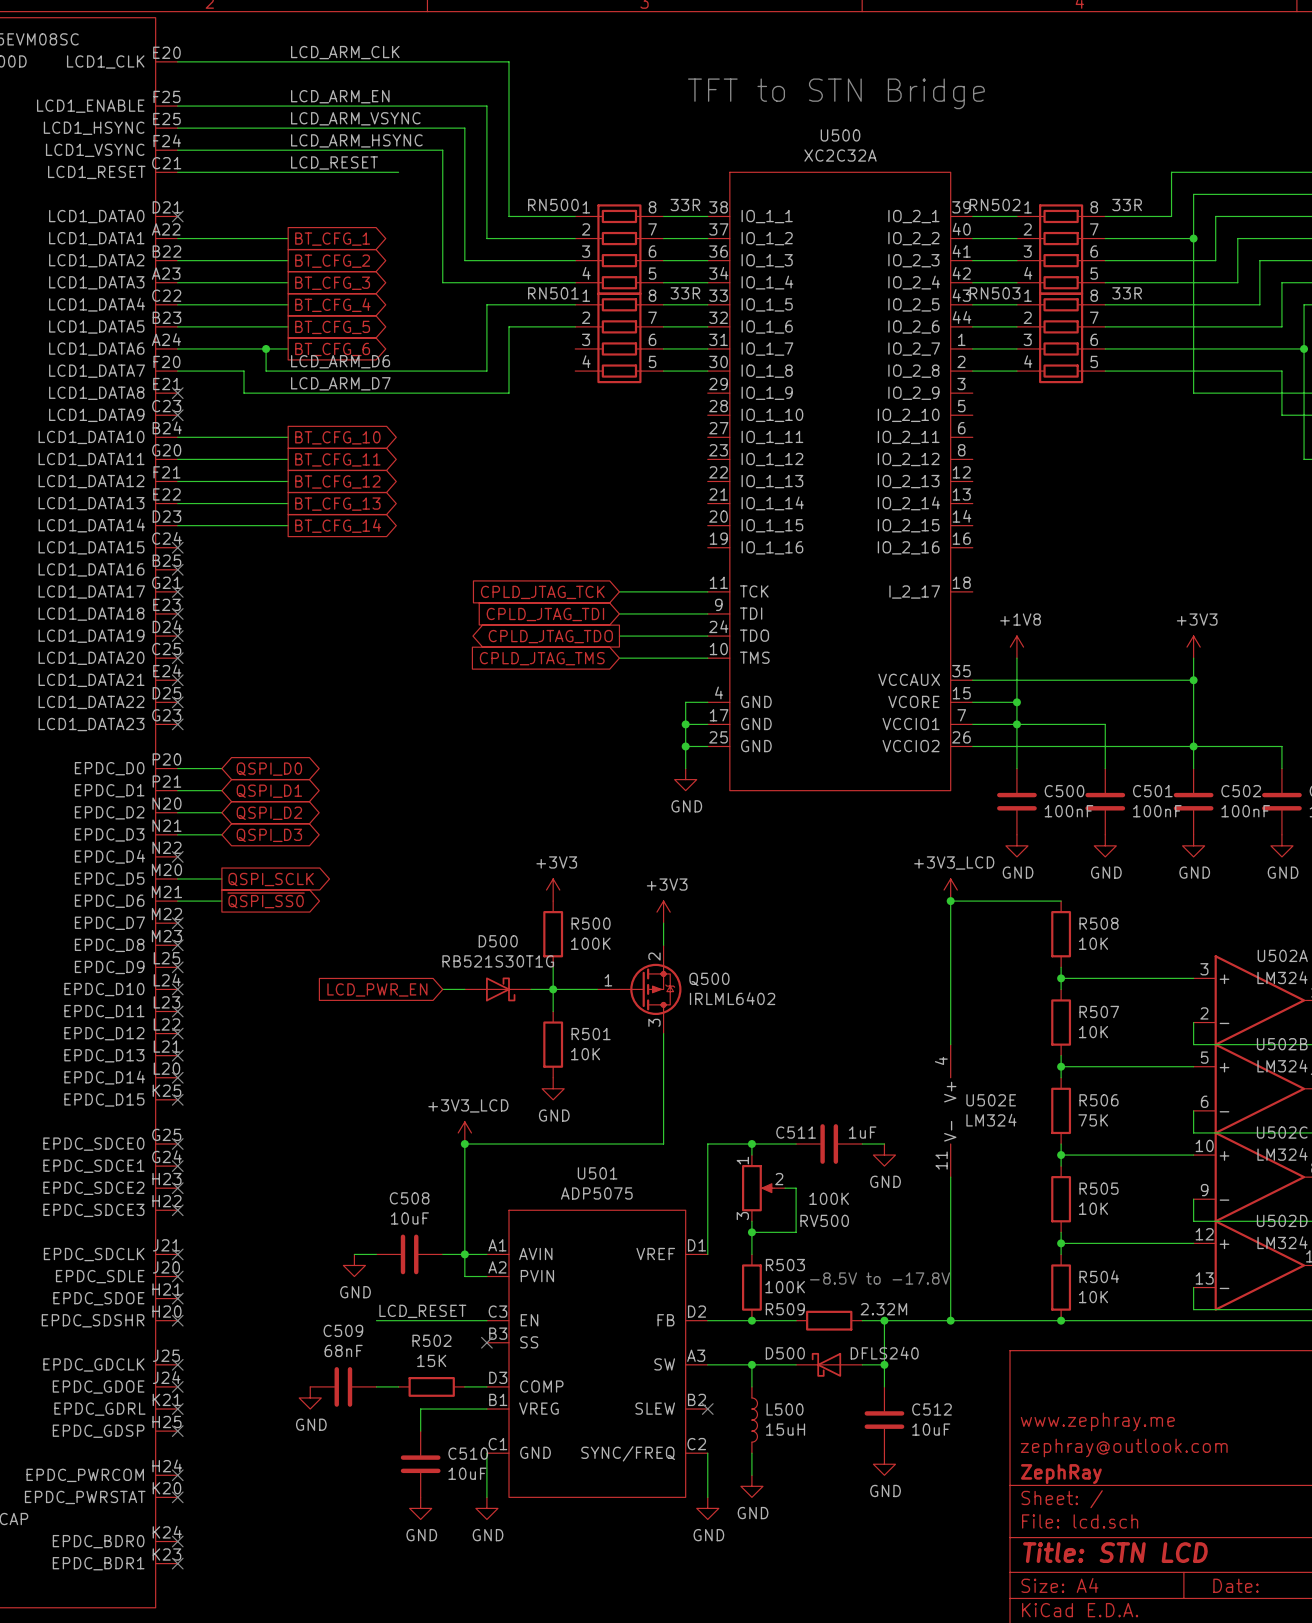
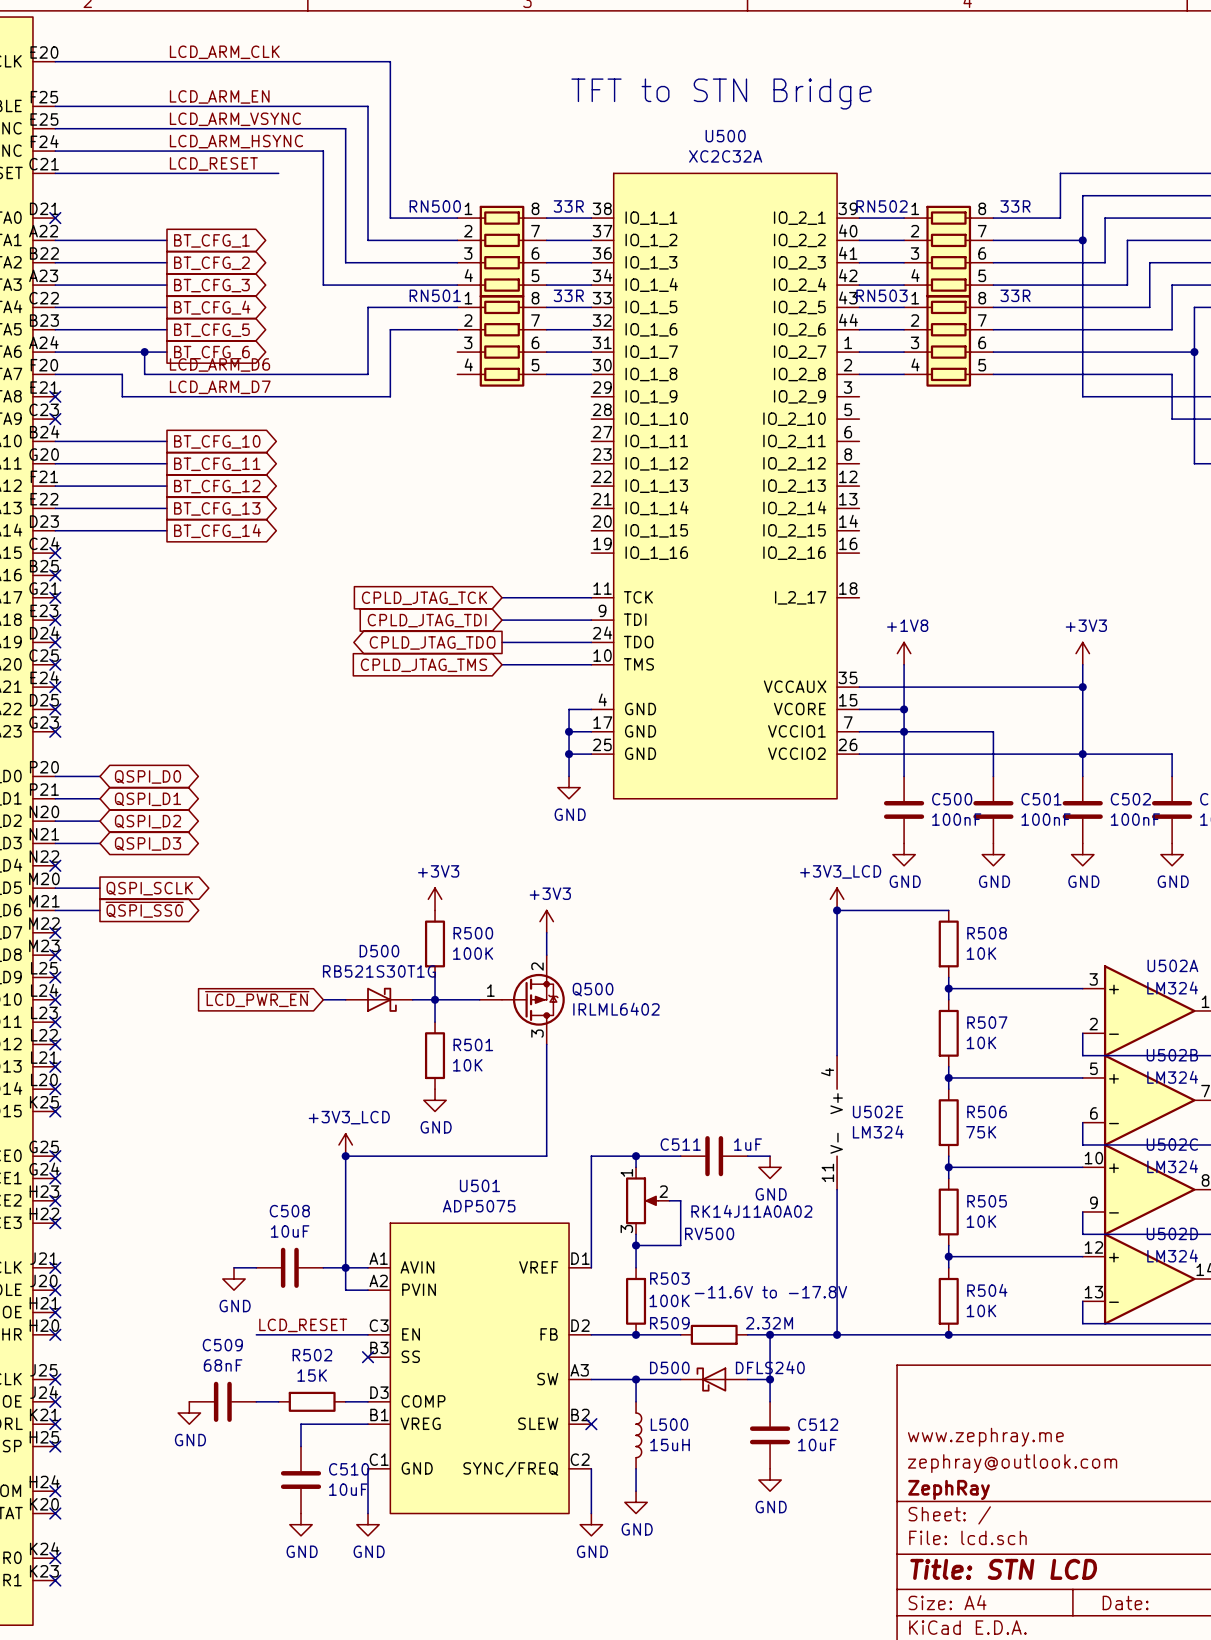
global label: LCD_PWR_EN (377, 989) -> ~{LCD_PWR_EN} (257, 999)
RV500 value: 100K (829, 1198) -> RK14J11A0A02 (751, 1211)
text: -8.5V to -17.8V (880, 1278) -> -11.6V to -17.8V (770, 1292)

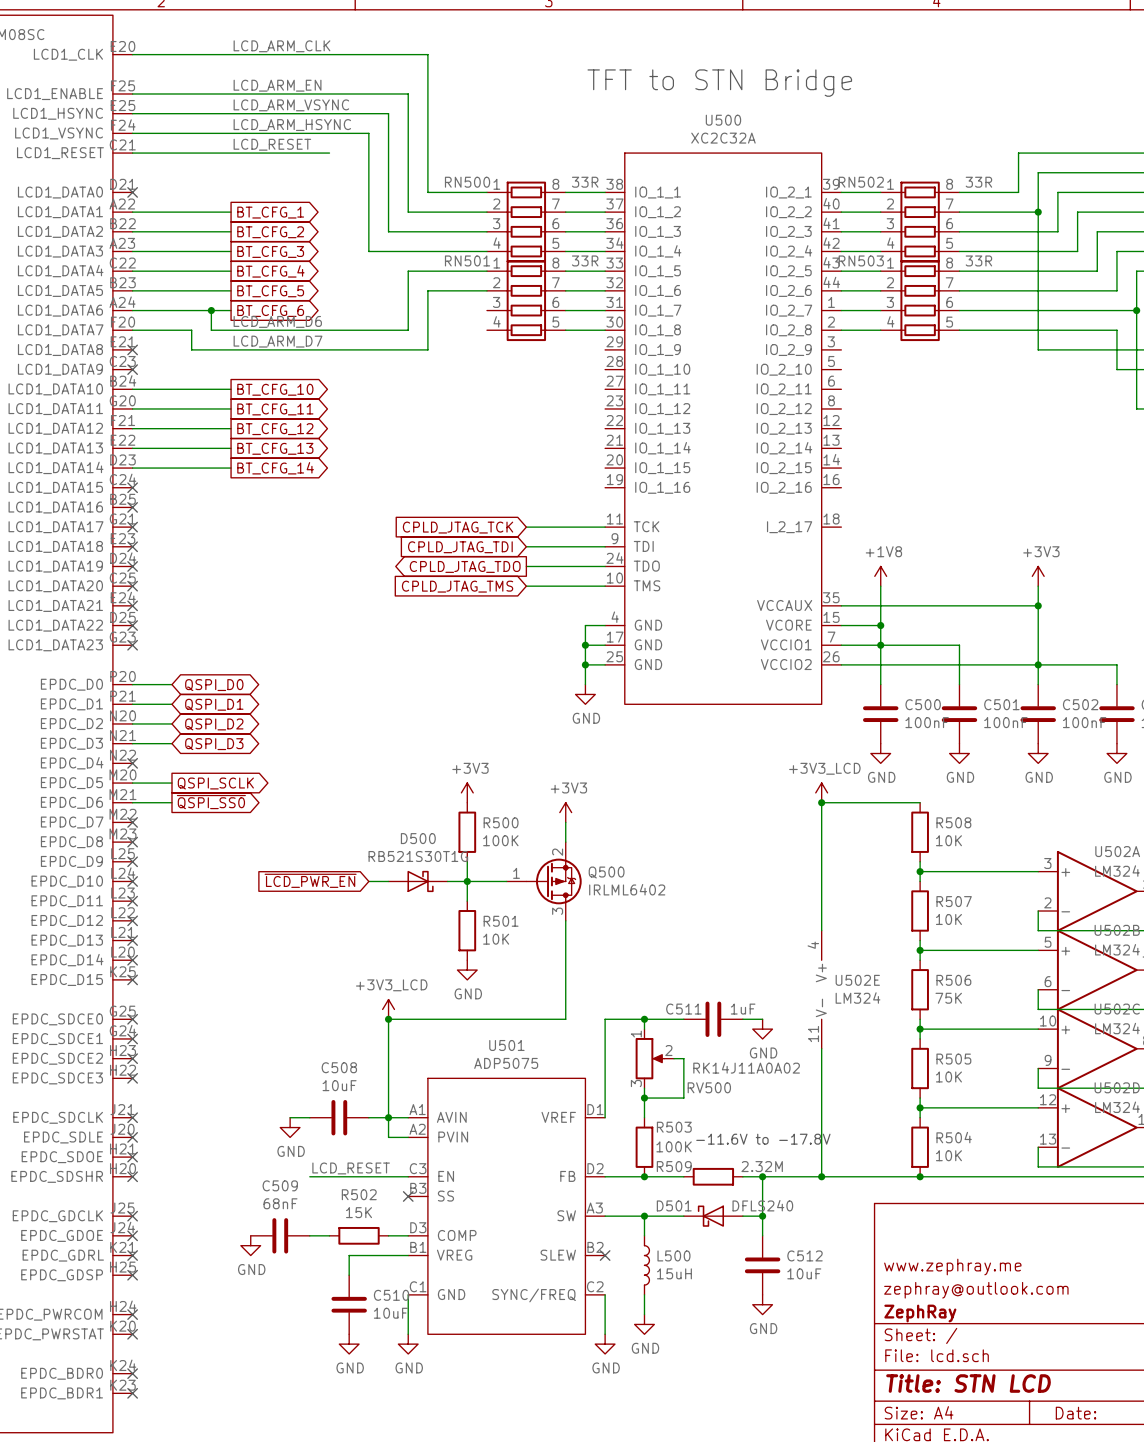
D500 name: D500 (669, 1367) -> D501 (674, 1205)

